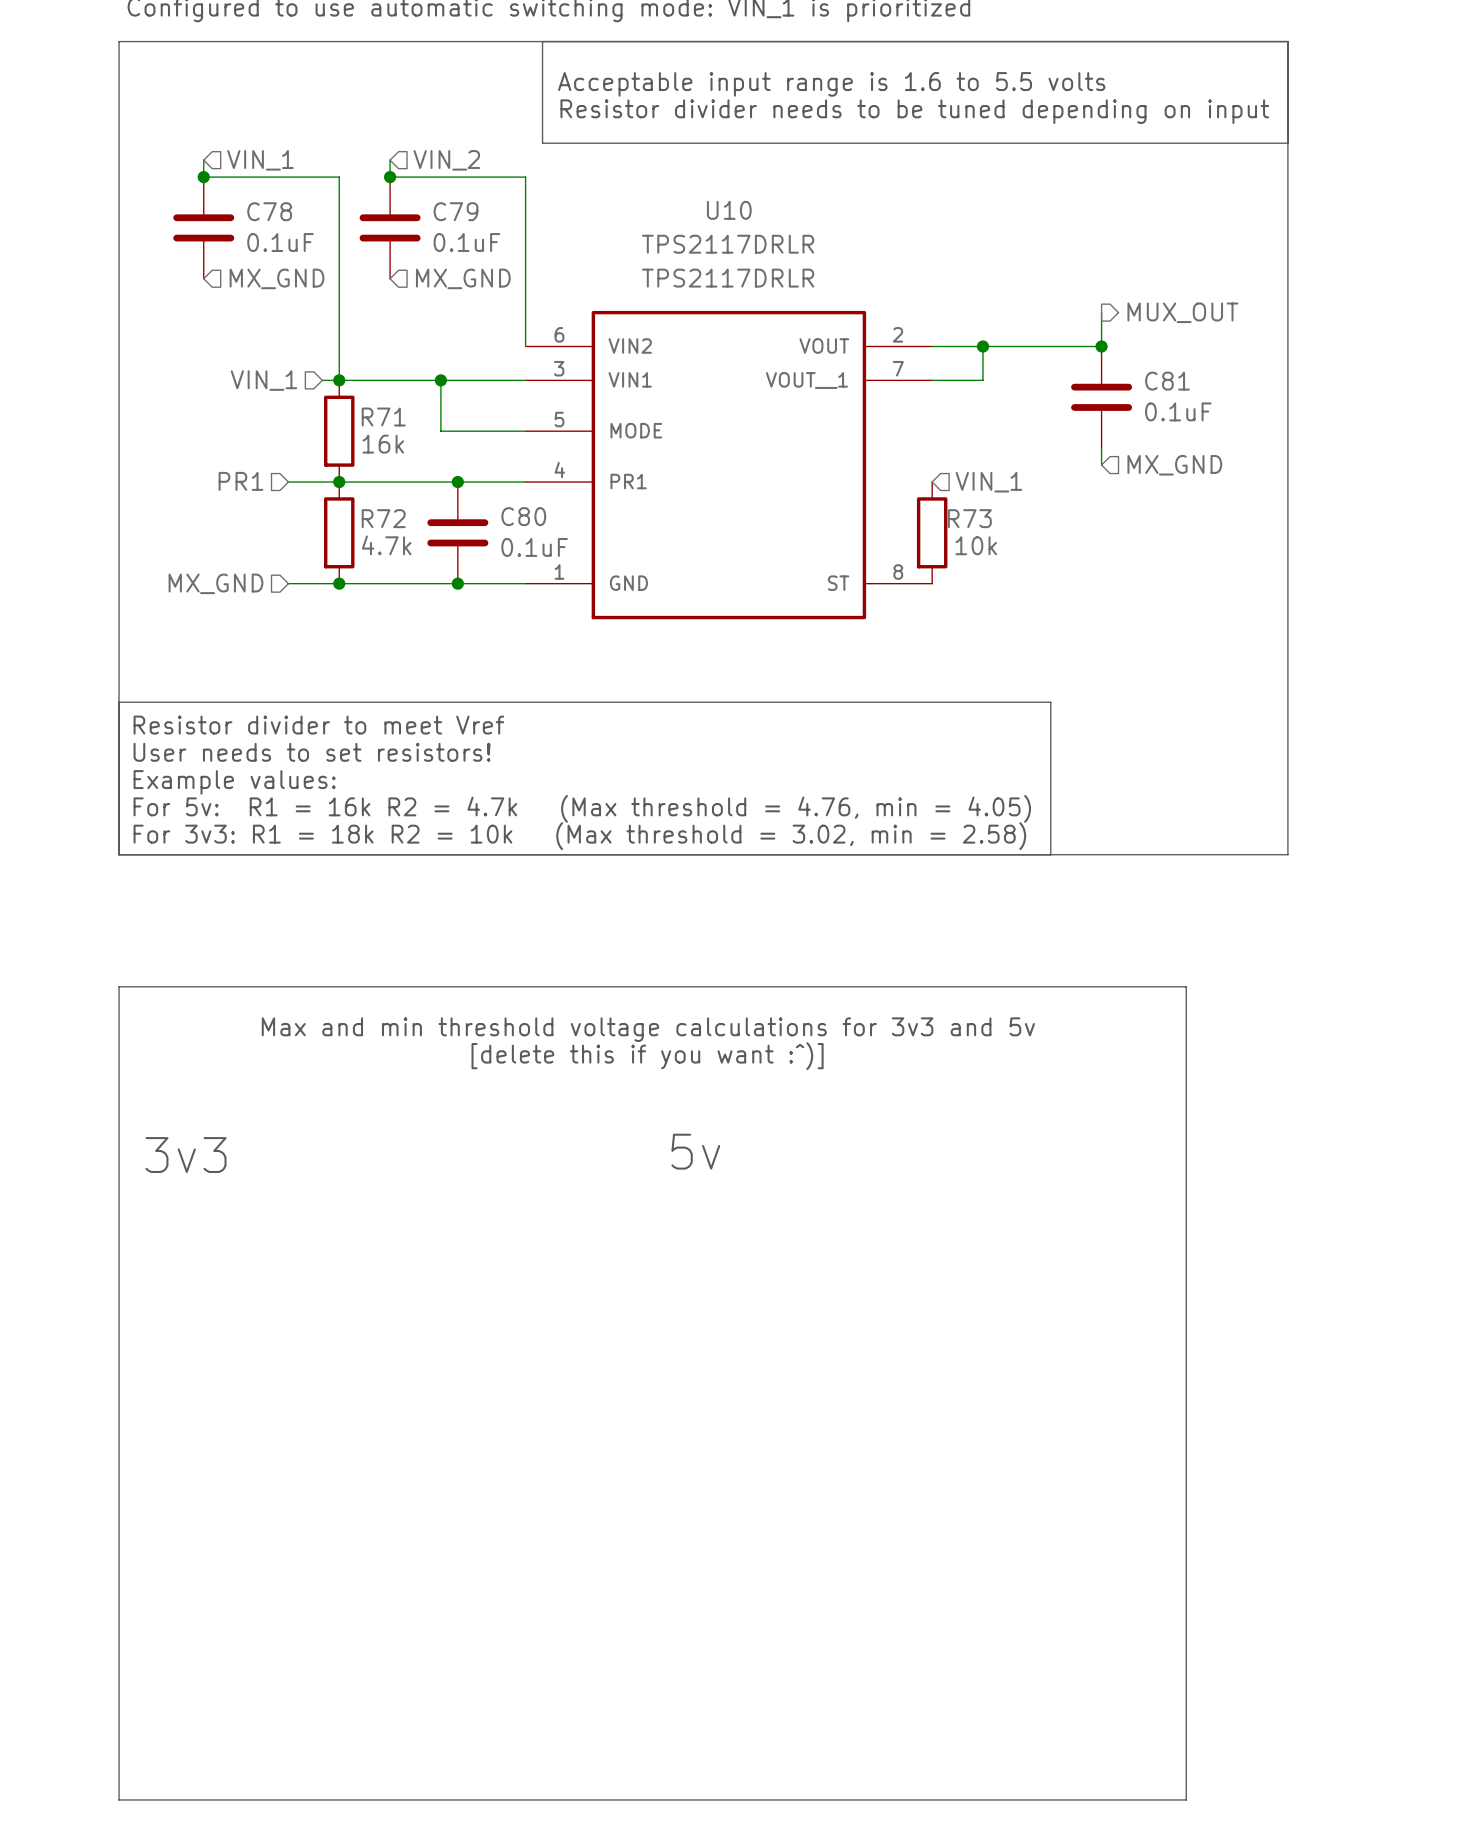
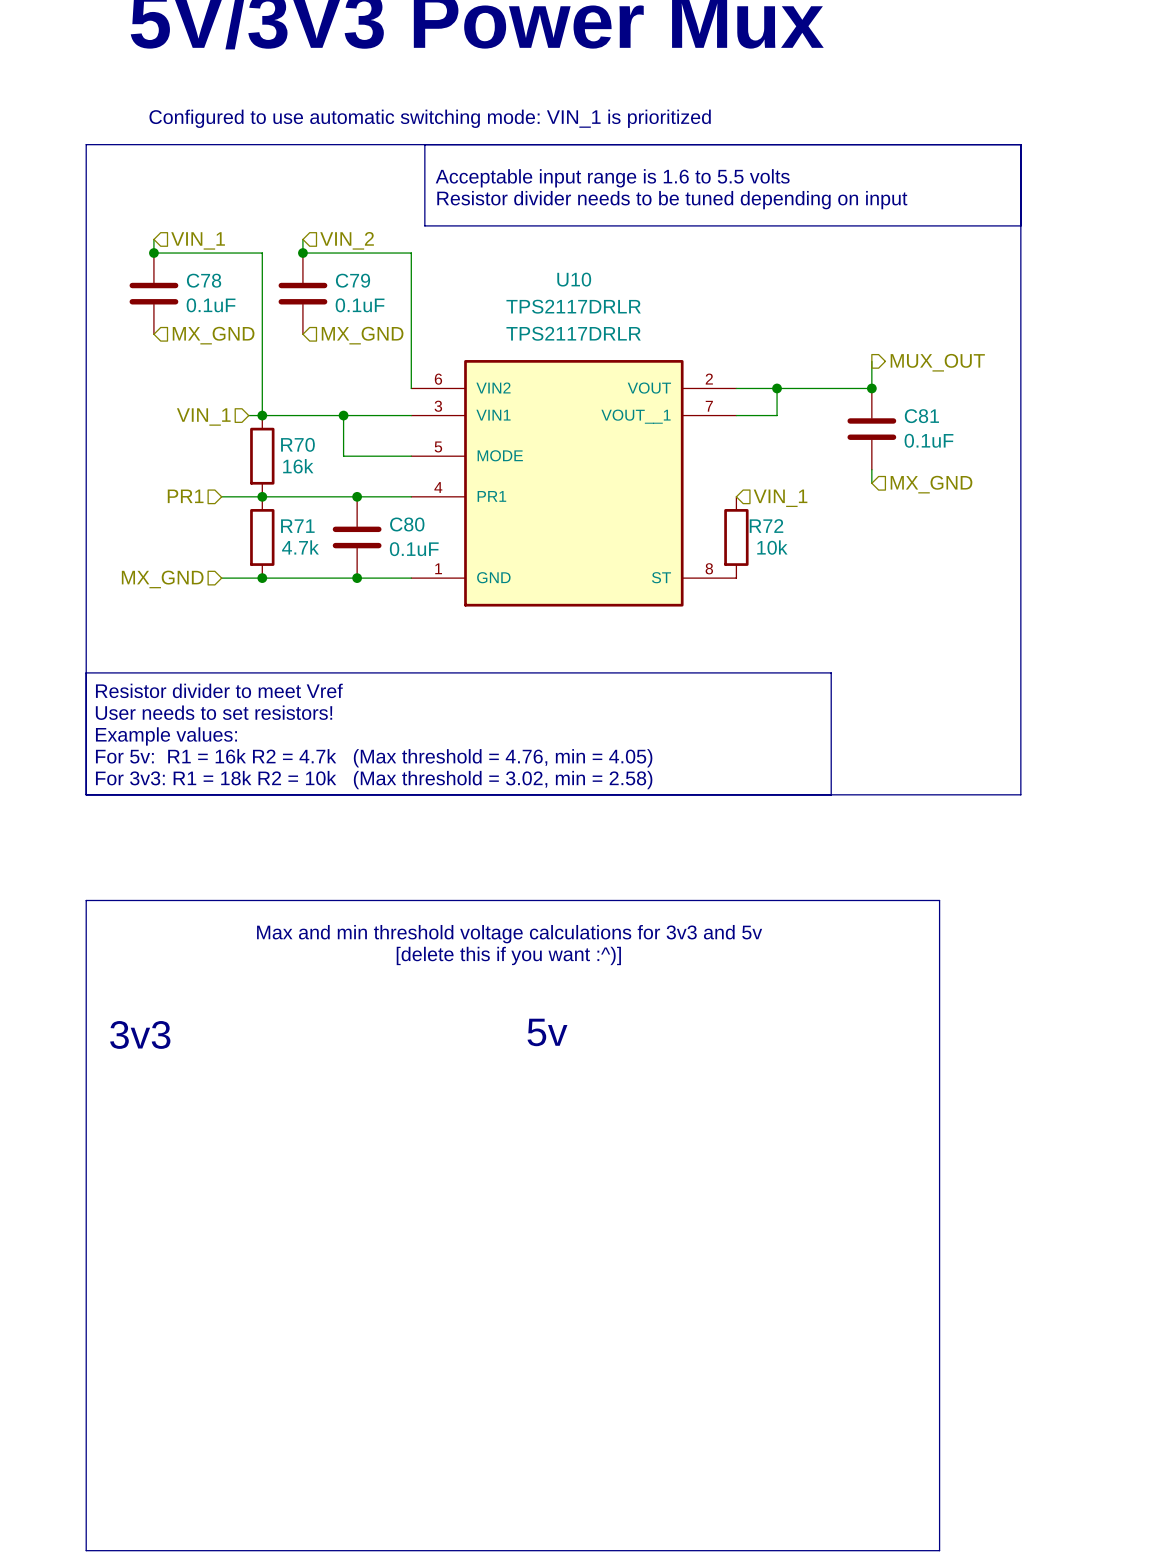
R71 name: R71 (383, 417) -> R70 (297, 444)
R72 name: R72 (383, 518) -> R71 (297, 526)
R73 name: R73 (969, 518) -> R72 (766, 526)

